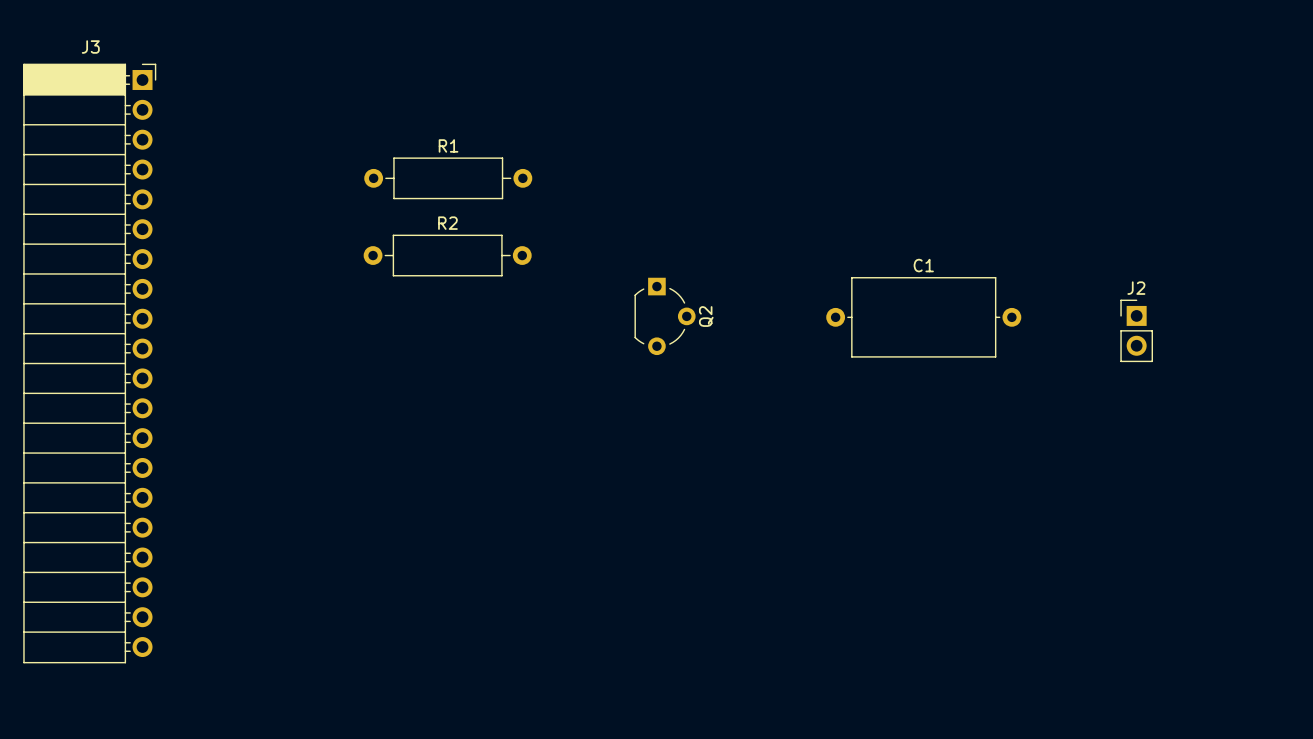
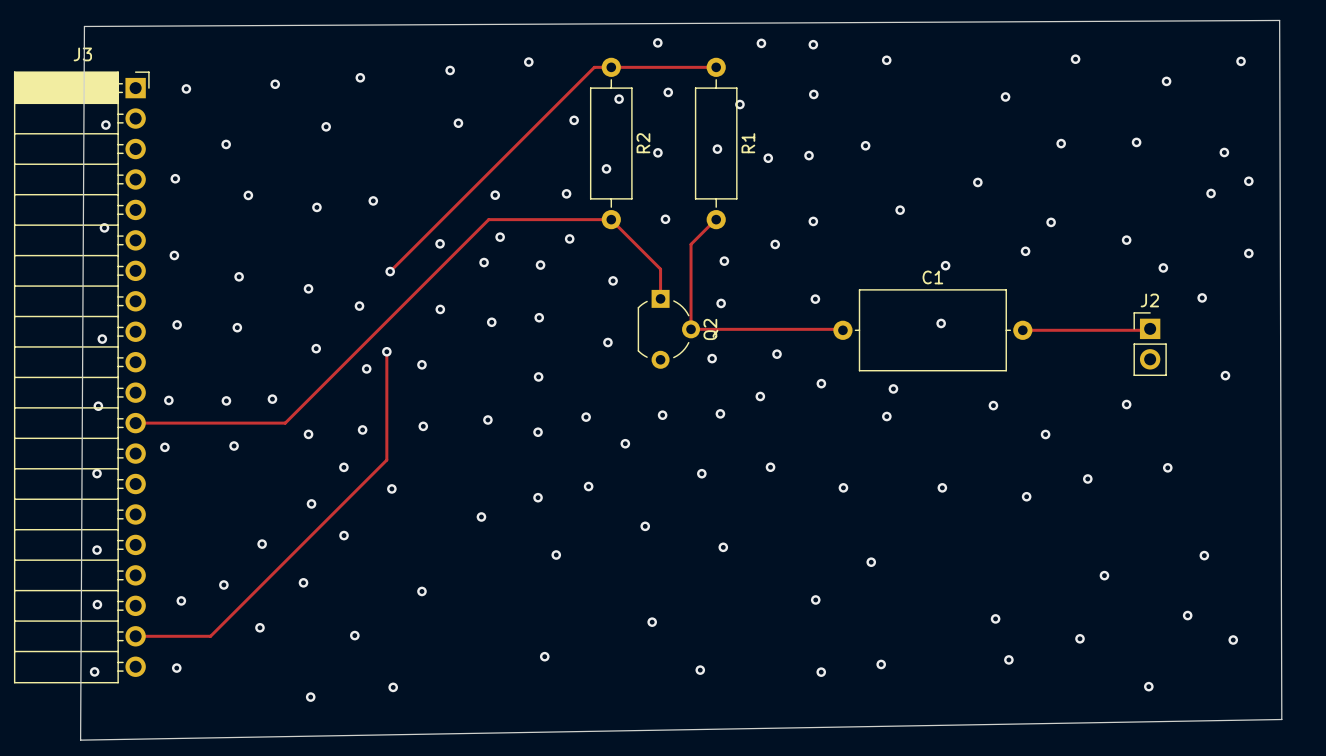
board edge: none -> (1279, 20) (1281, 719) (80, 740) (84, 26) (1279, 20)
via: none -> (657, 42)
via: none -> (761, 43)
via: none -> (813, 44)
via: none -> (1075, 59)
via: none -> (886, 60)
via: none -> (1241, 61)
via: none -> (528, 62)
track: none -> (715, 67) (594, 67) (390, 271)
via: none -> (450, 70)
via: none -> (360, 77)
via: none -> (1166, 81)
via: none -> (275, 84)
via: none -> (186, 88)
via: none -> (668, 92)
via: none -> (813, 94)
via: none -> (1005, 96)
via: none -> (619, 99)
via: none -> (739, 104)
via: none -> (574, 120)
via: none -> (458, 123)
via: none -> (105, 125)
via: none -> (326, 126)
via: none -> (1136, 142)
via: none -> (1061, 143)
via: none -> (226, 144)
via: none -> (865, 145)
via: none -> (717, 149)
via: none -> (657, 152)
via: none -> (1224, 152)
via: none -> (809, 155)
via: none -> (768, 158)
via: none -> (606, 168)
via: none -> (175, 178)
via: none -> (1248, 181)
via: none -> (977, 182)
R1 rotation: 0° (448, 178) -> 90° clockwise (716, 143)
R1 position: (448, 178) -> (716, 143)
via: none -> (566, 193)
via: none -> (1211, 193)
via: none -> (495, 195)
via: none -> (248, 195)
via: none -> (373, 200)
via: none -> (316, 207)
via: none -> (900, 210)
track: none -> (610, 219) (660, 269) (660, 298)
track: none -> (610, 219) (488, 219) (285, 423) (135, 423)
via: none -> (665, 219)
track: none -> (715, 219) (691, 244) (691, 329) (842, 329)
via: none -> (813, 221)
via: none -> (1051, 222)
via: none -> (104, 227)
via: none -> (500, 237)
via: none -> (569, 238)
via: none -> (1126, 240)
via: none -> (440, 243)
via: none -> (775, 244)
via: none -> (1025, 251)
via: none -> (1248, 253)
via: none -> (174, 255)
via: none -> (724, 261)
via: none -> (484, 262)
via: none -> (540, 265)
via: none -> (945, 265)
R2 rotation: 0° (447, 255) -> 90° clockwise (611, 143)
R2 position: (447, 255) -> (611, 143)
via: none -> (1163, 267)
via: none -> (390, 271)
via: none -> (239, 276)
via: none -> (613, 280)
via: none -> (308, 288)
via: none -> (1202, 297)
via: none -> (815, 299)
via: none -> (721, 303)
via: none -> (359, 306)
via: none -> (440, 309)
via: none -> (539, 317)
via: none -> (491, 322)
via: none -> (941, 323)
via: none -> (177, 324)
via: none -> (237, 327)
track: none -> (1148, 328) (1146, 330) (1022, 330)
via: none -> (102, 339)
via: none -> (607, 342)
via: none -> (316, 348)
track: none -> (386, 351) (386, 460) (210, 636) (135, 636)
via: none -> (386, 351)
via: none -> (777, 354)
via: none -> (712, 358)
via: none -> (421, 364)
via: none -> (366, 368)
via: none -> (1225, 375)
via: none -> (538, 376)
via: none -> (821, 383)
via: none -> (893, 388)
via: none -> (760, 396)
via: none -> (272, 399)
via: none -> (168, 400)
via: none -> (226, 400)
via: none -> (1126, 404)
via: none -> (98, 406)
via: none -> (993, 405)
via: none -> (720, 413)
via: none -> (662, 415)
via: none -> (886, 416)
via: none -> (586, 417)
via: none -> (487, 419)
via: none -> (423, 426)
via: none -> (362, 429)
via: none -> (538, 432)
via: none -> (308, 434)
via: none -> (1045, 434)
via: none -> (625, 443)
via: none -> (234, 446)
via: none -> (164, 447)
via: none -> (343, 467)
via: none -> (770, 467)
via: none -> (1167, 467)
via: none -> (97, 473)
via: none -> (701, 473)
via: none -> (1087, 478)
via: none -> (588, 486)
via: none -> (843, 487)
via: none -> (942, 487)
via: none -> (391, 488)
via: none -> (1026, 496)
via: none -> (538, 497)
via: none -> (311, 503)
via: none -> (481, 516)
via: none -> (645, 526)
via: none -> (344, 535)
via: none -> (262, 544)
via: none -> (723, 547)
via: none -> (97, 550)
via: none -> (556, 555)
via: none -> (1204, 555)
via: none -> (871, 562)
via: none -> (1104, 575)
via: none -> (303, 582)
via: none -> (223, 584)
via: none -> (421, 591)
via: none -> (815, 599)
via: none -> (181, 600)
via: none -> (97, 604)
via: none -> (1187, 615)
via: none -> (995, 618)
via: none -> (652, 622)
via: none -> (259, 627)
via: none -> (354, 635)
via: none -> (1080, 638)
via: none -> (1233, 640)
via: none -> (544, 656)
via: none -> (1008, 659)
via: none -> (881, 664)
via: none -> (176, 668)
via: none -> (700, 670)
via: none -> (94, 671)
via: none -> (821, 672)
via: none -> (1148, 686)
via: none -> (393, 687)
via: none -> (310, 697)

